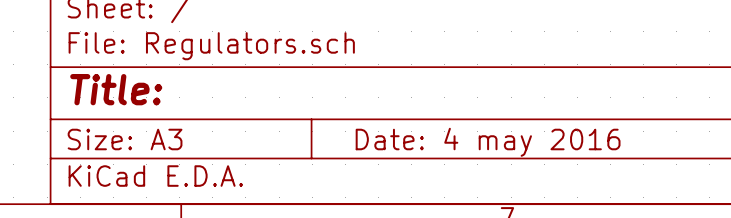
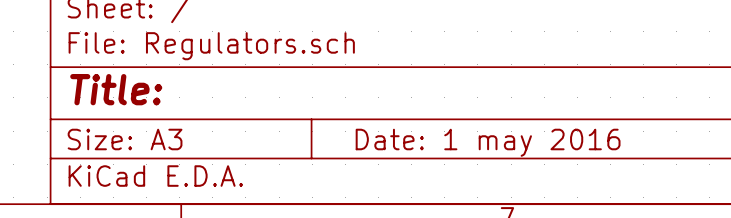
title block: Date: 4 may 2016 (488, 142) -> Date: 1 may 2016 (488, 142)

